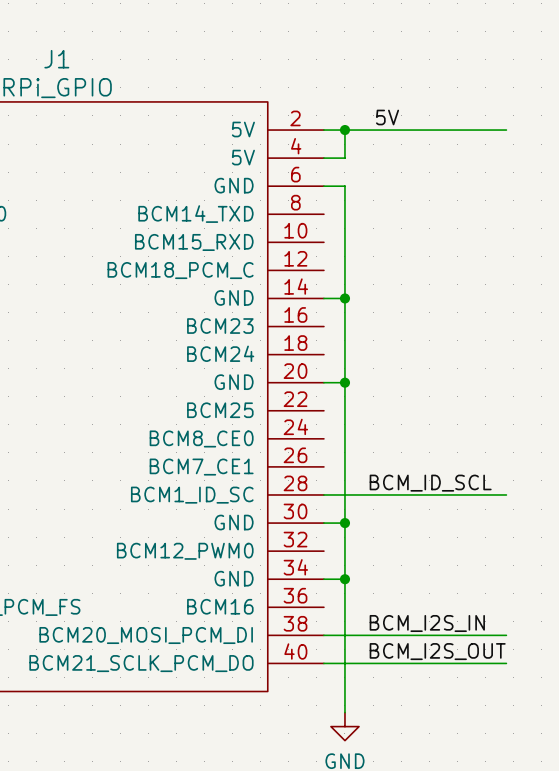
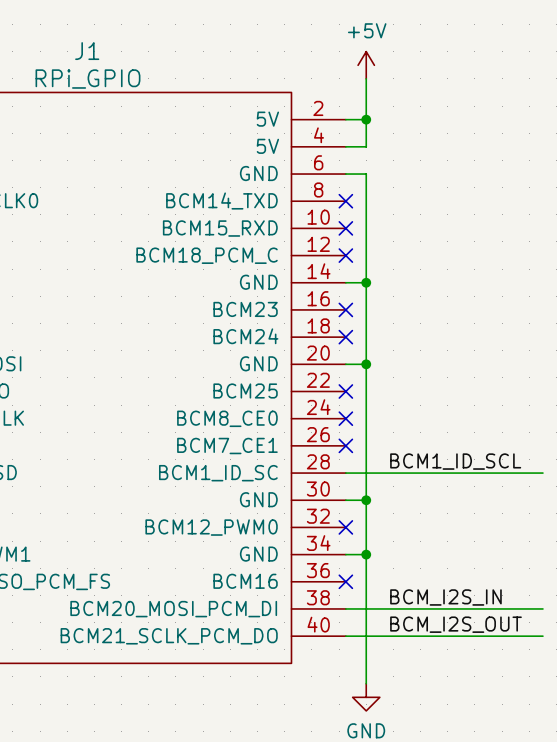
power symbol: none -> +5V (366, 65)
label: 5V (387, 117) -> none
wire: (344, 130) (506, 130) -> (366, 119) (366, 78)
no-connect mark: none -> (345, 201)
no-connect mark: none -> (345, 228)
no-connect mark: none -> (345, 255)
no-connect mark: none -> (345, 309)
no-connect mark: none -> (345, 337)
no-connect mark: none -> (345, 391)
no-connect mark: none -> (345, 418)
no-connect mark: none -> (345, 445)
label: BCM_ID_SCL (430, 483) -> BCM1_ID_SCL (455, 461)
wire: none -> (522, 473) (542, 473)
no-connect mark: none -> (345, 527)
no-connect mark: none -> (345, 581)
wire: none -> (522, 608) (542, 608)
wire: none -> (522, 636) (542, 636)

